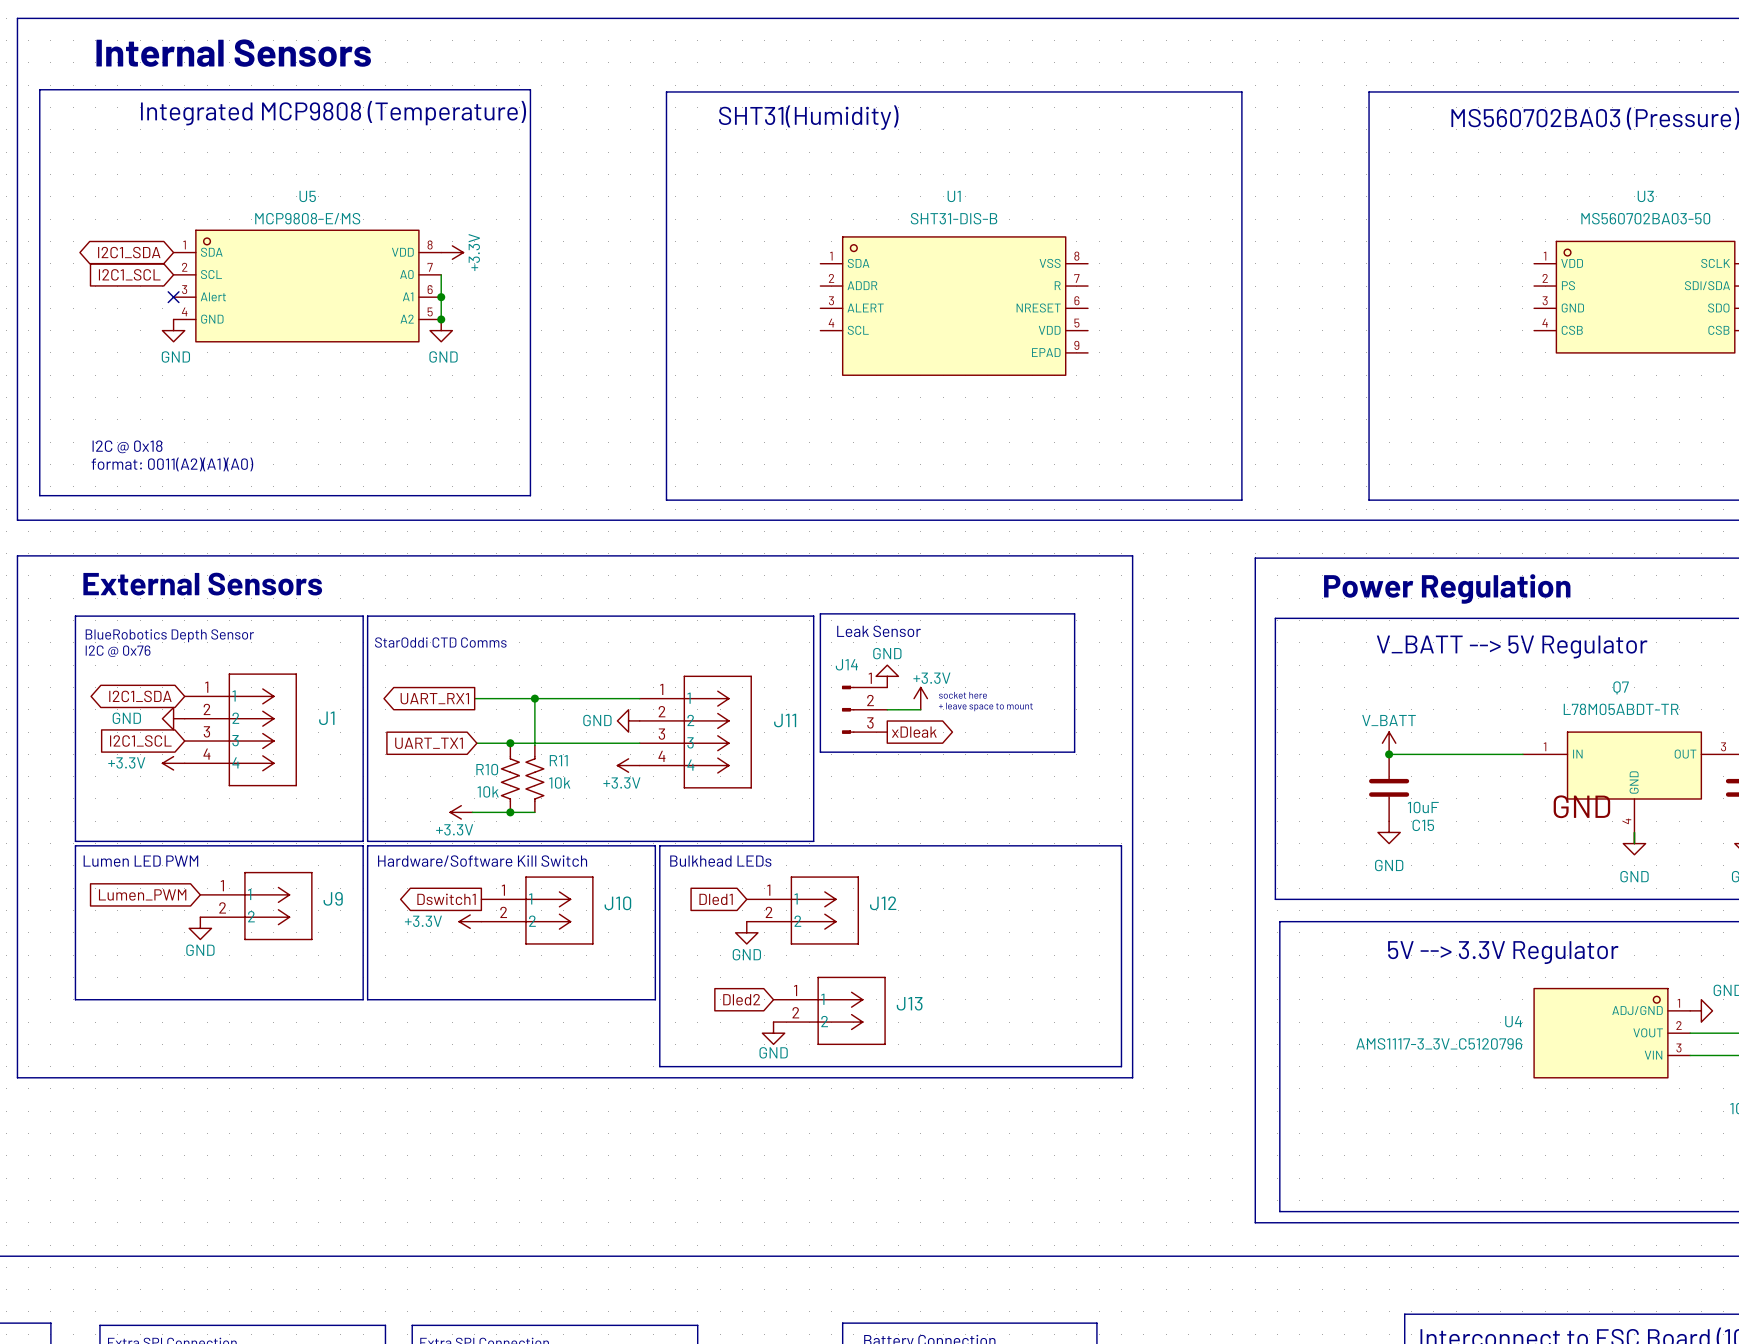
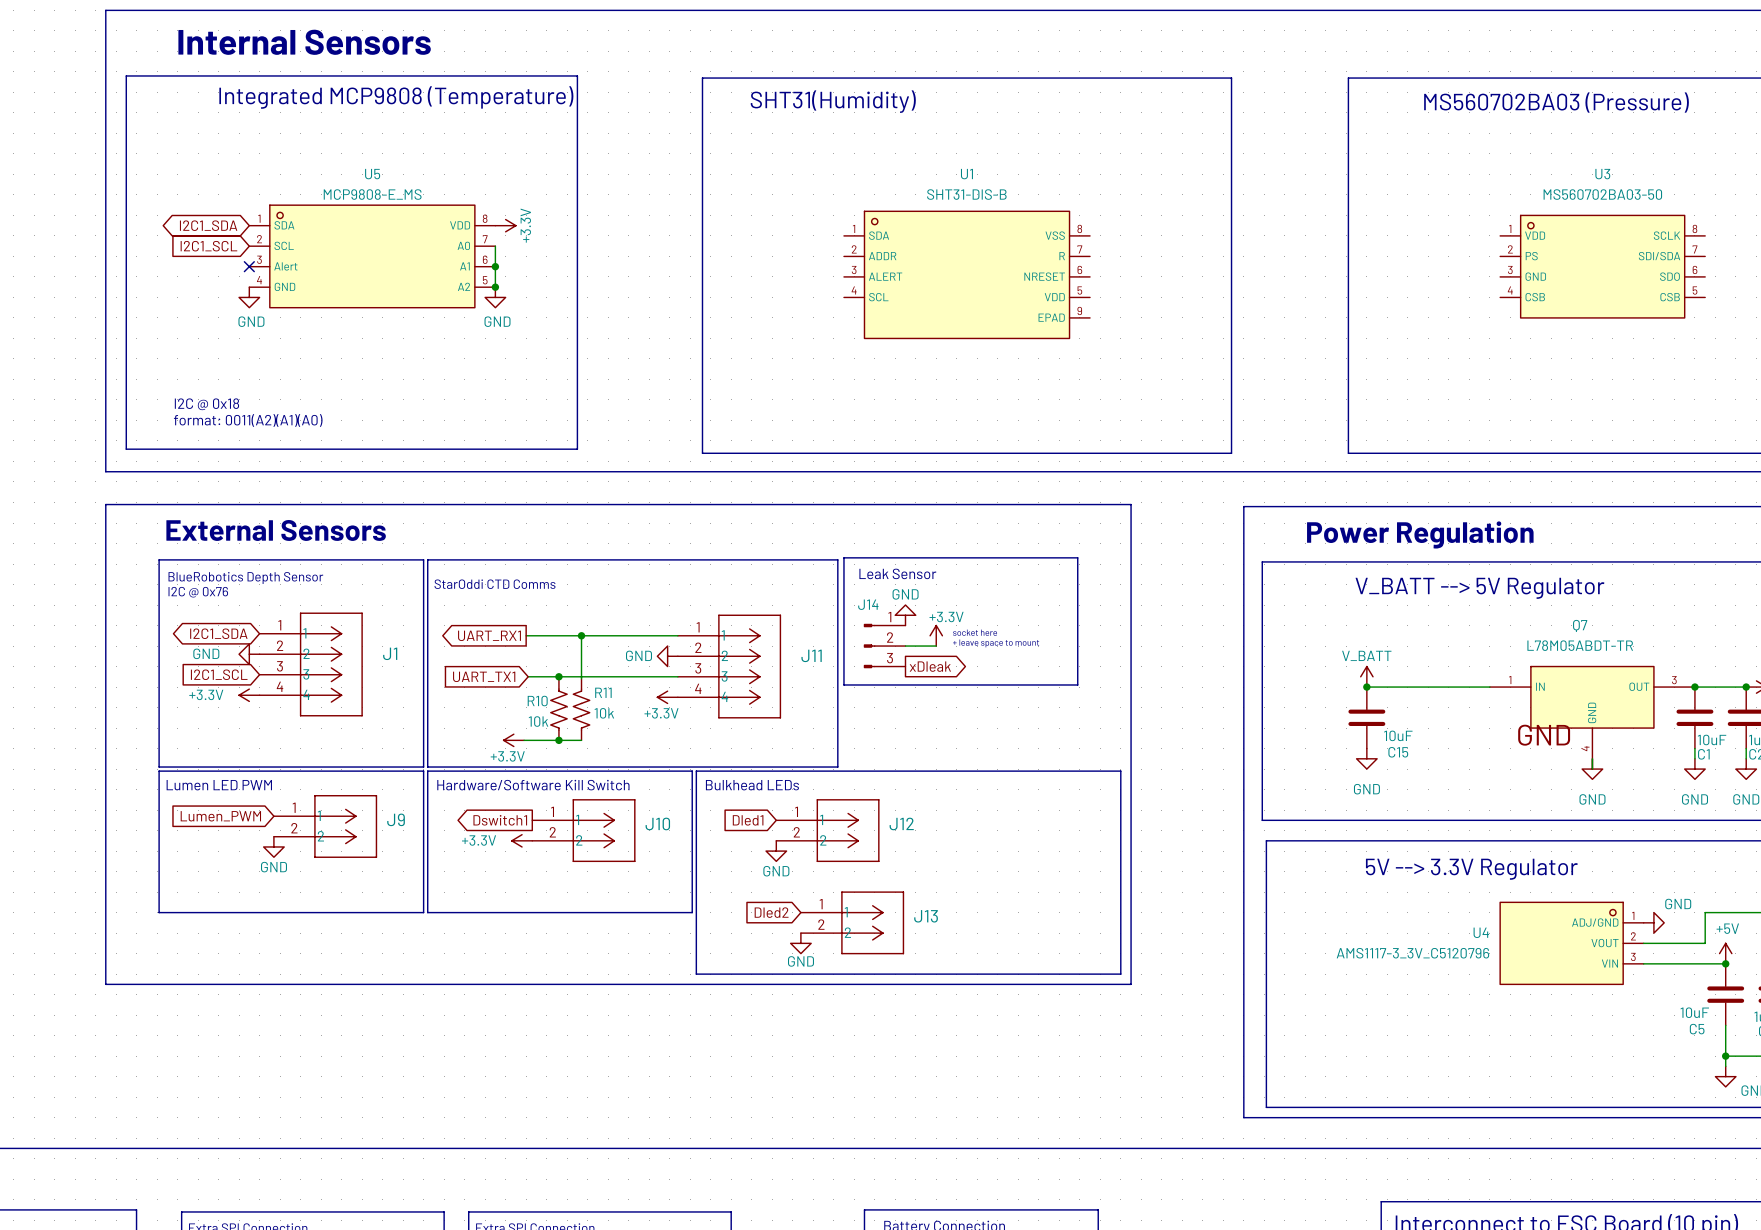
U5 value: MCP9808-E/MS (307, 218) -> MCP9808-E_MS (372, 194)

